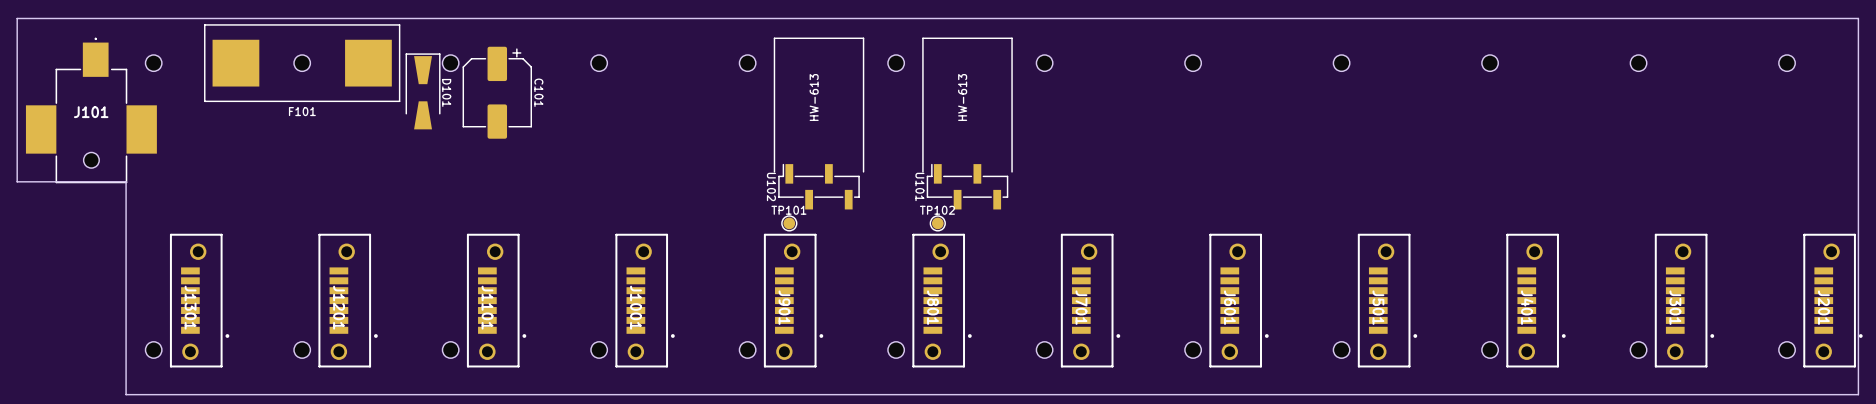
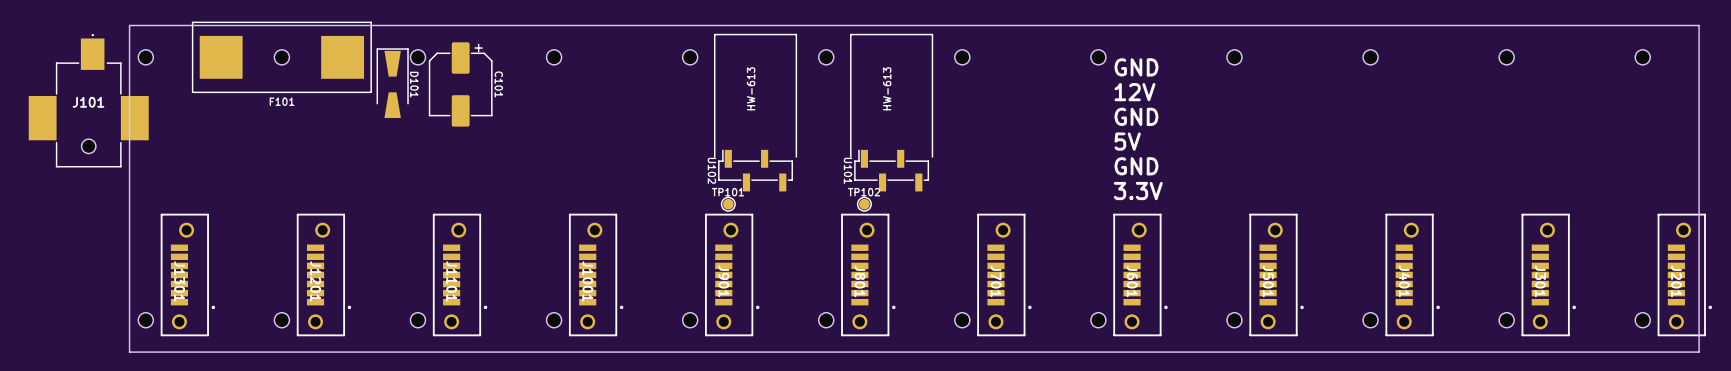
board edge: (1858, 18) (17, 18) (17, 181) (126, 181) (126, 394) (1858, 394) (1858, 18) -> (1699, 25) (1699, 352) (129, 352) (129, 25) (1699, 25)
text: none -> GND (1136, 67)
text: none -> 12V (1135, 92)
text: none -> GND (1136, 116)
text: none -> 5V (1127, 141)
text: none -> GND (1136, 166)
text: none -> 3.3V (1138, 191)

